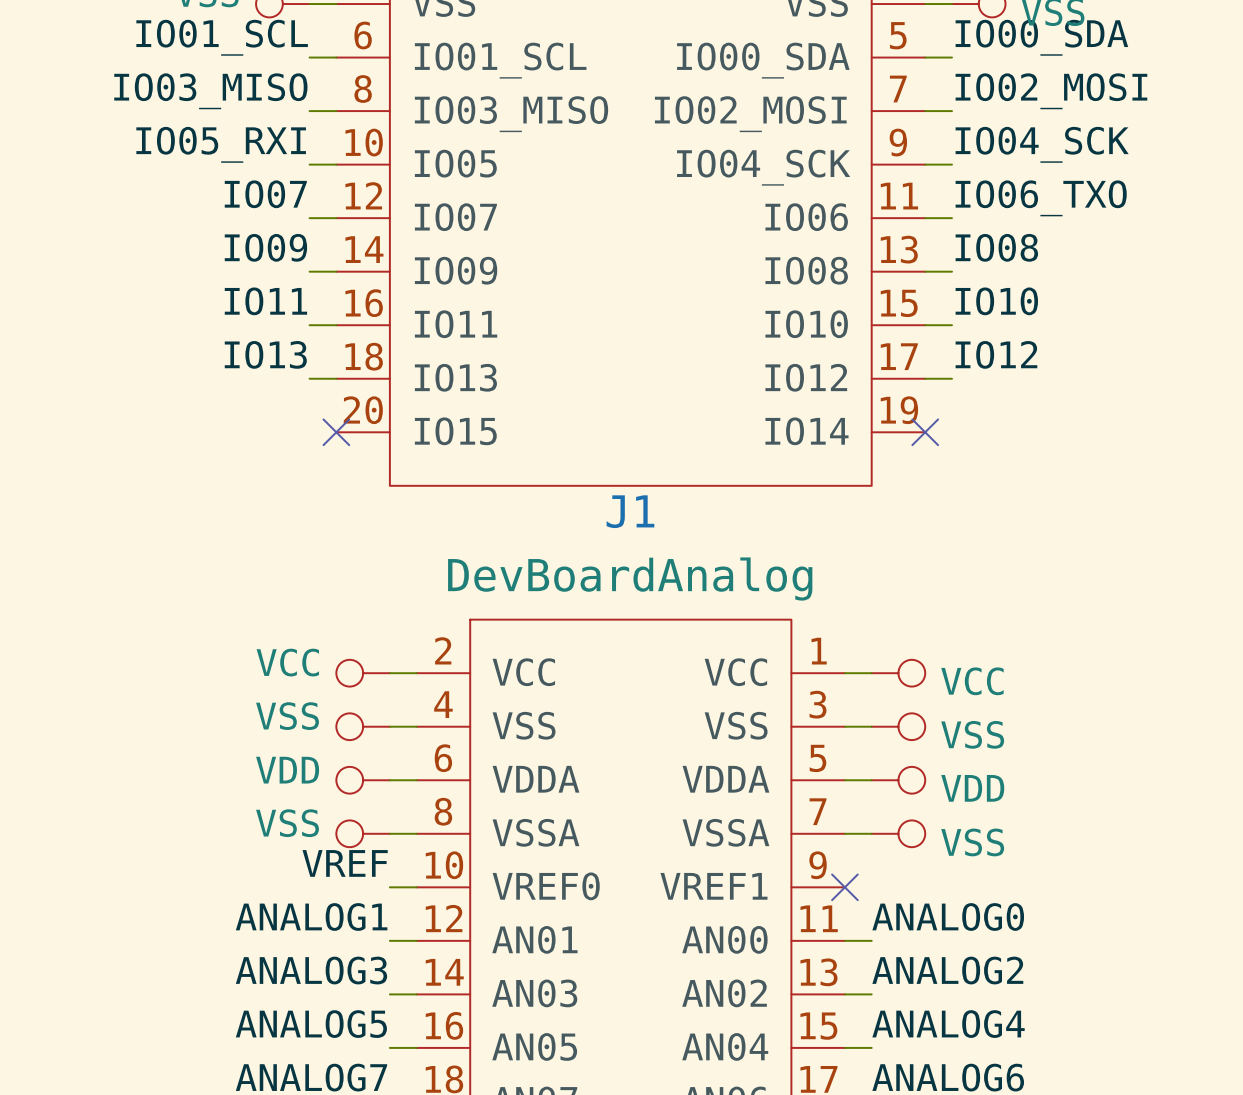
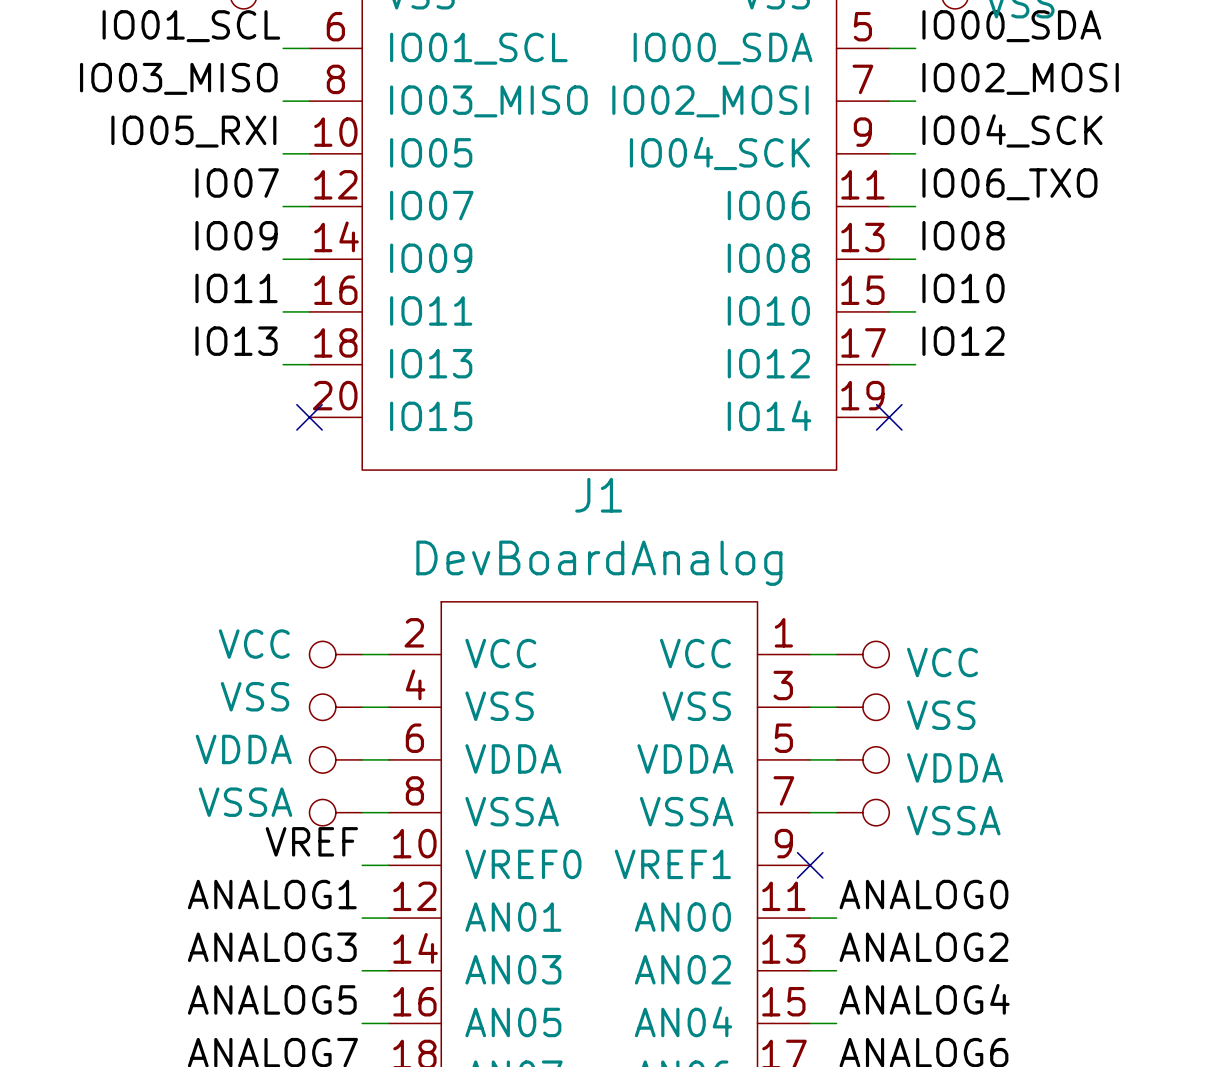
power symbol: VDD (363, 780) -> VDDA (335, 759)
power symbol: VDD (898, 780) -> VDDA (862, 759)
power symbol: VSS (363, 833) -> VSSA (335, 812)
power symbol: VSS (898, 833) -> VSSA (862, 812)

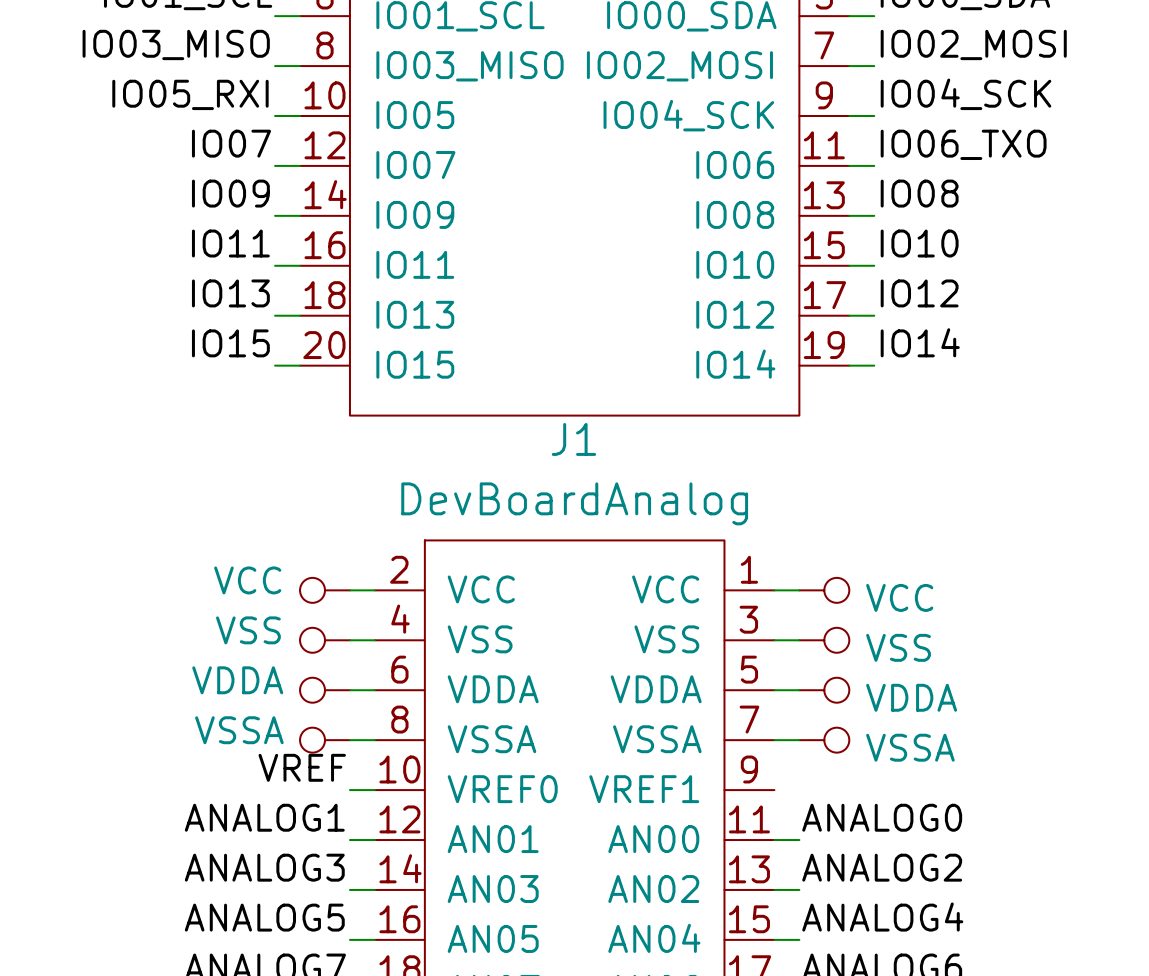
label: none -> IO15 (230, 343)
label: none -> IO14 (920, 342)
wire: none -> (275, 365) (300, 365)
no-connect mark: (309, 417) -> none
wire: none -> (849, 365) (874, 365)
no-connect mark: (889, 417) -> none
no-connect mark: (810, 865) -> none

